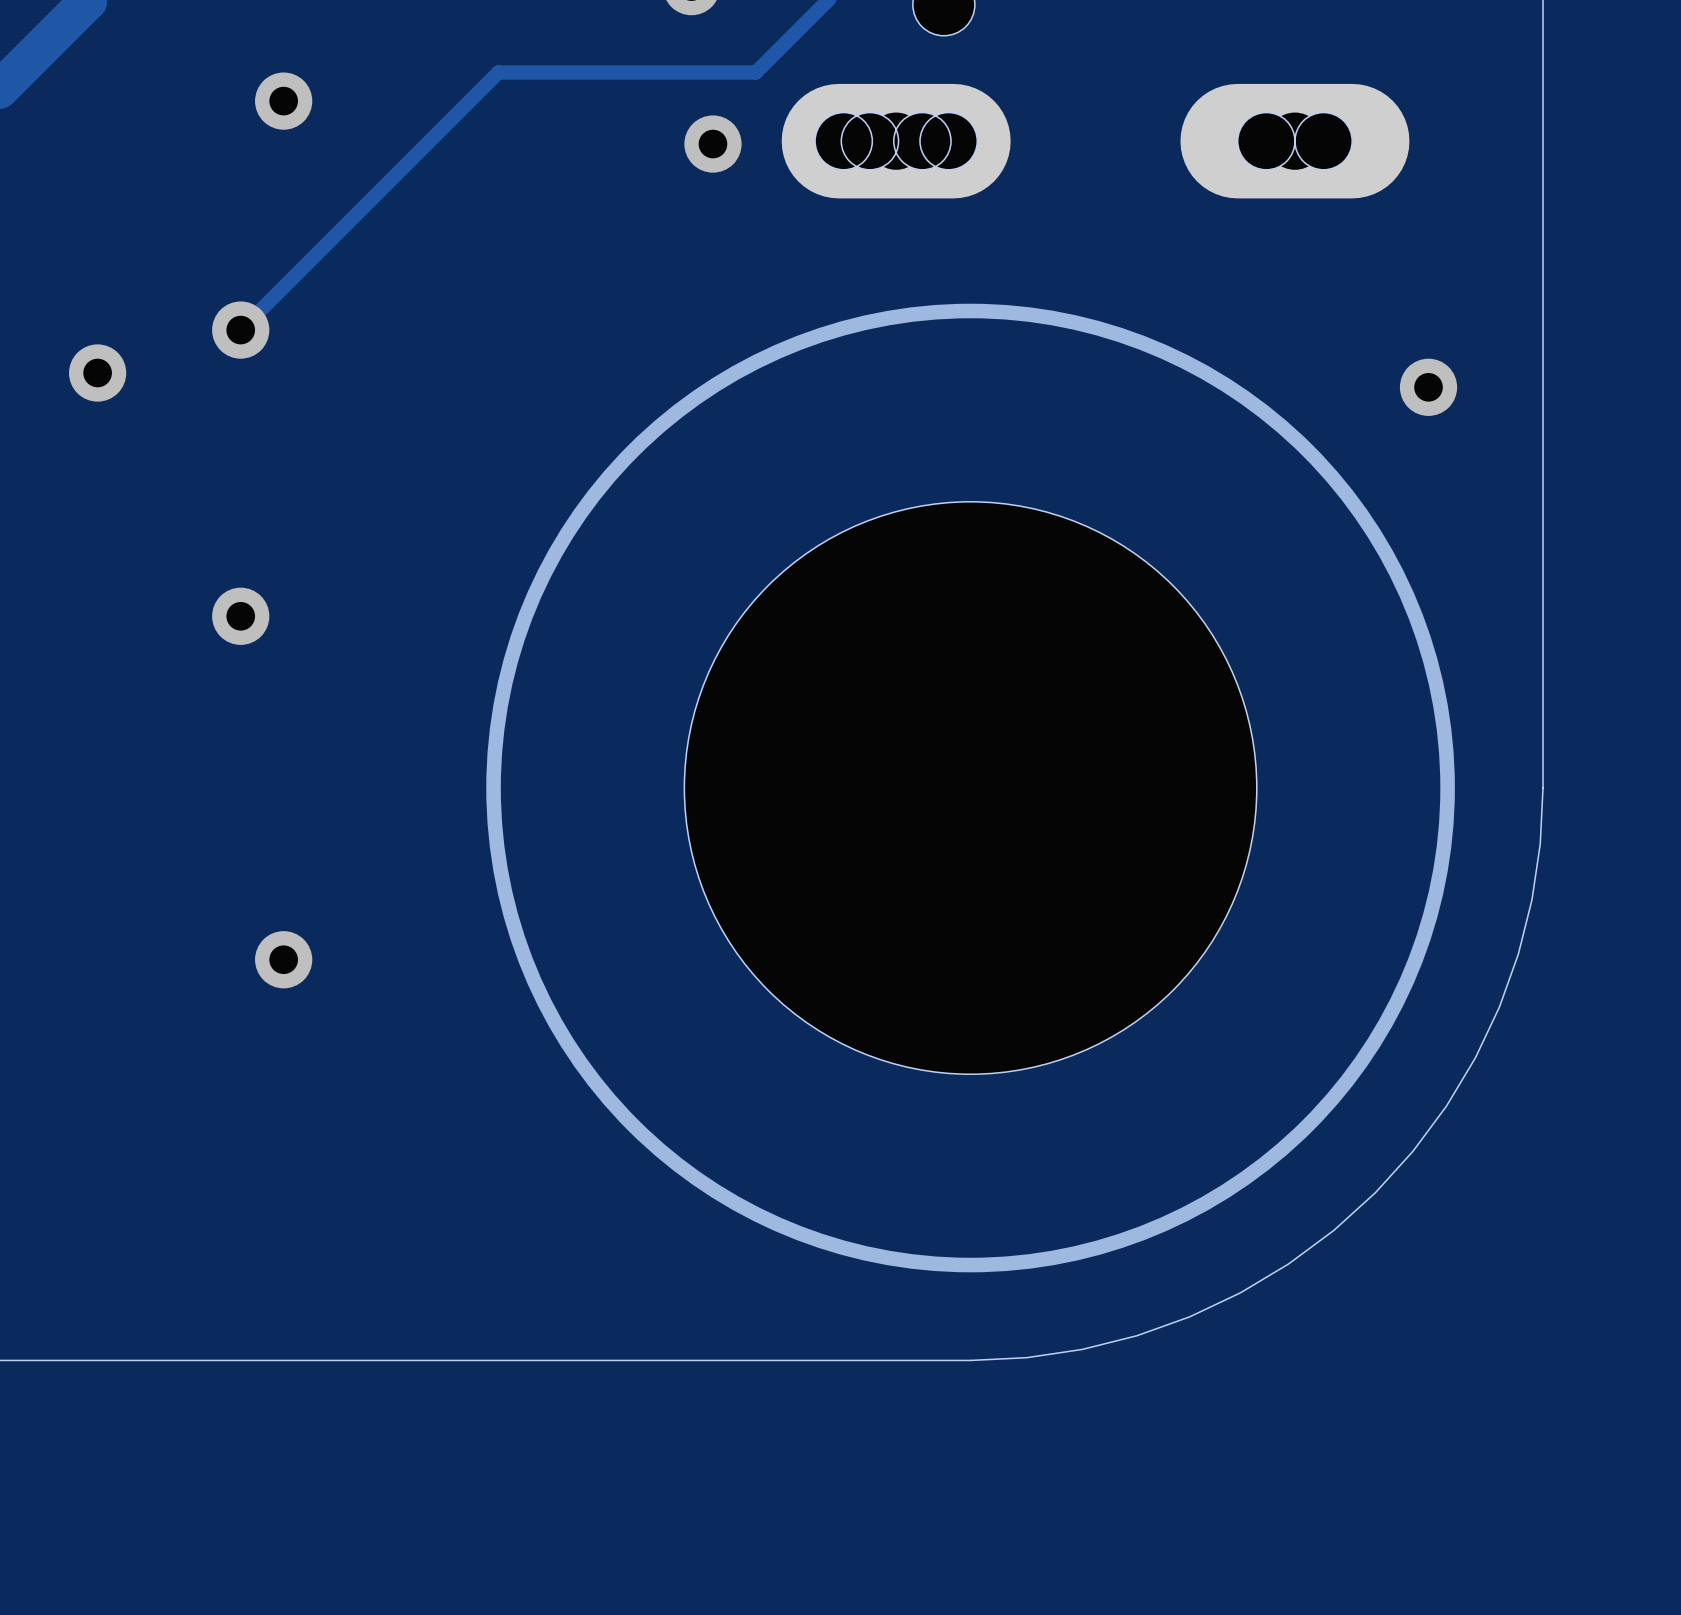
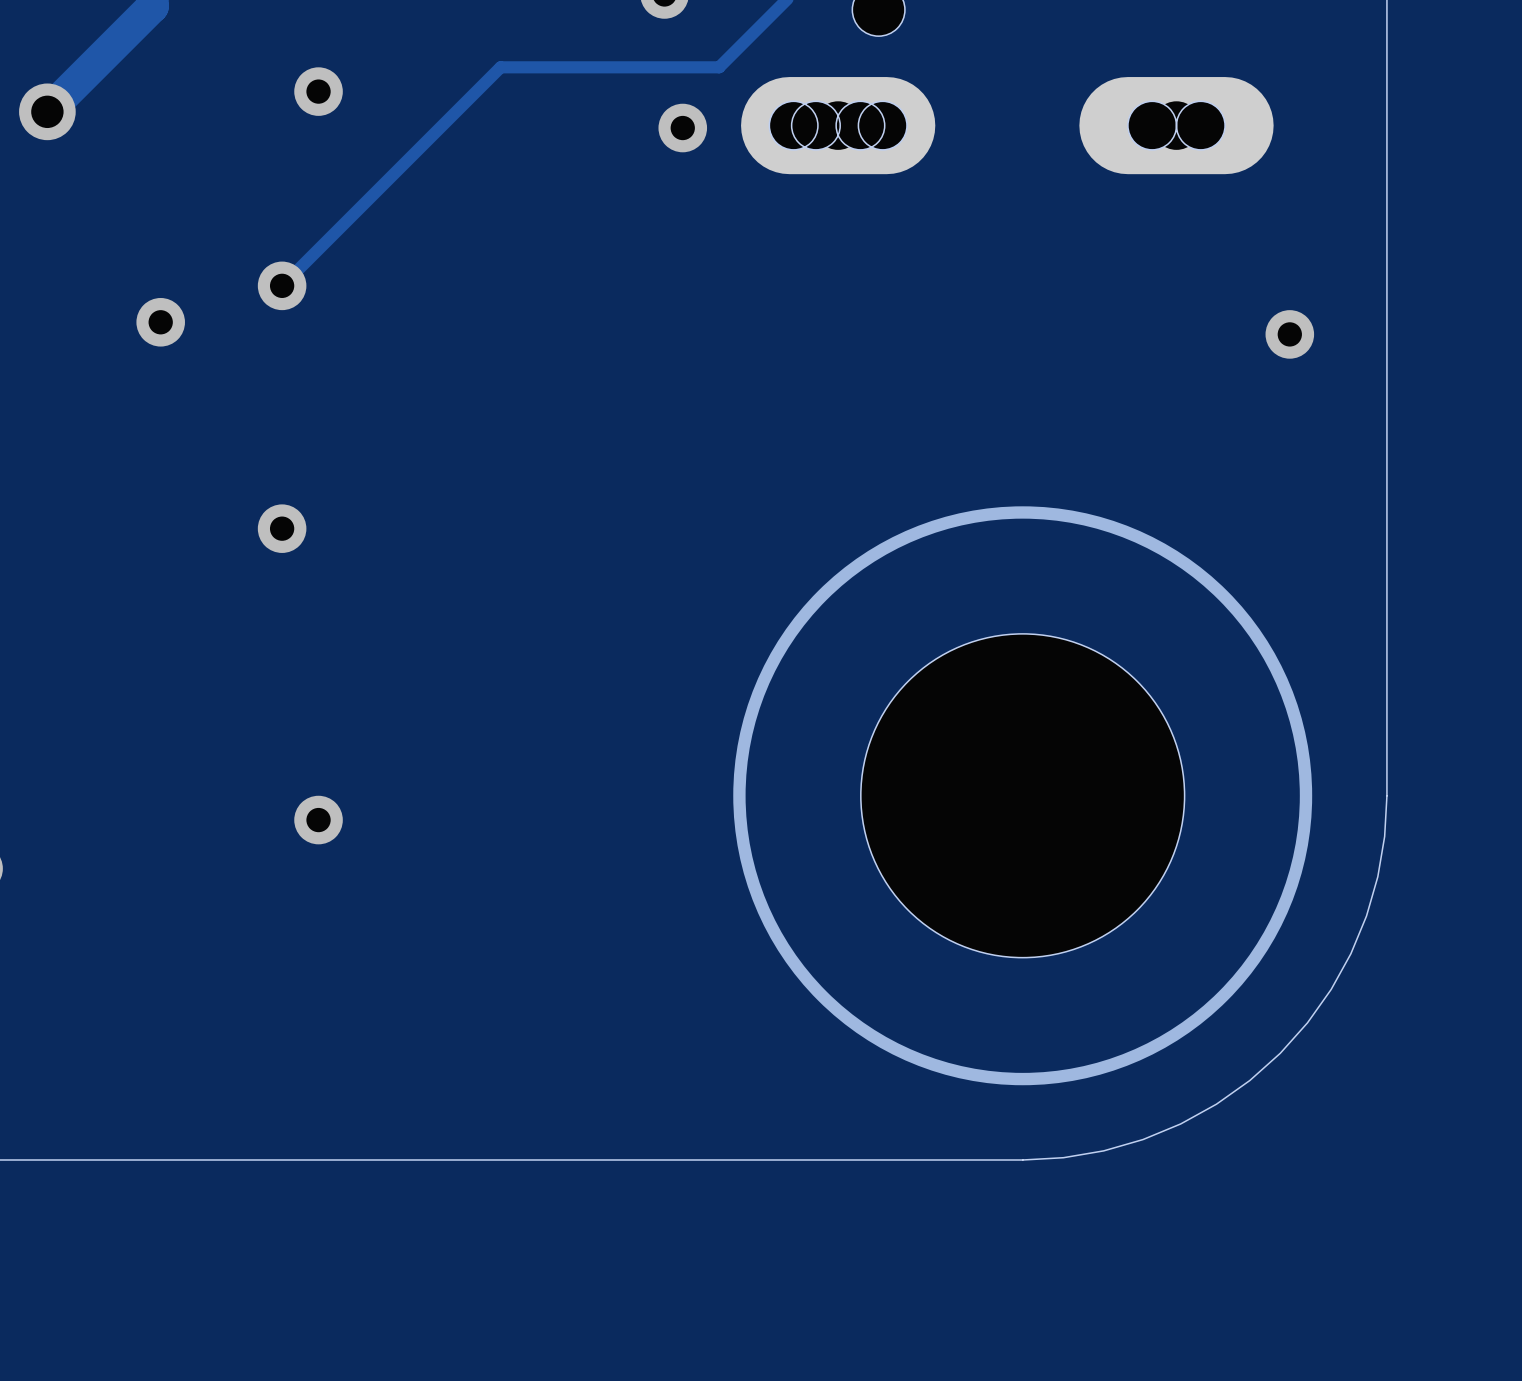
drawing: [486, 303, 1455, 1273] -> none
drawing: none -> [733, 506, 1313, 1086]
hole: (970, 788) -> none
board edge: (1543, 788) (1540, 844) (1532, 899) (1518, 954) (1499, 1007) (1475, 1057) (1446, 1106) (1413, 1151) (1375, 1192) (1333, 1230) (1288, 1263) (1240, 1292) (1189, 1316) (1136, 1335) (1082, 1349) (1026, 1357) (970, 1360) -> (1386, 674) (1386, 795) (1384, 836) (1377, 876) (1366, 916) (1350, 953) (1331, 989) (1307, 1022) (1280, 1053) (1249, 1080) (1216, 1104) (1180, 1123) (1143, 1139) (1103, 1150) (1063, 1157) (1022, 1160) (901, 1160)
hole: none -> (1022, 795)

